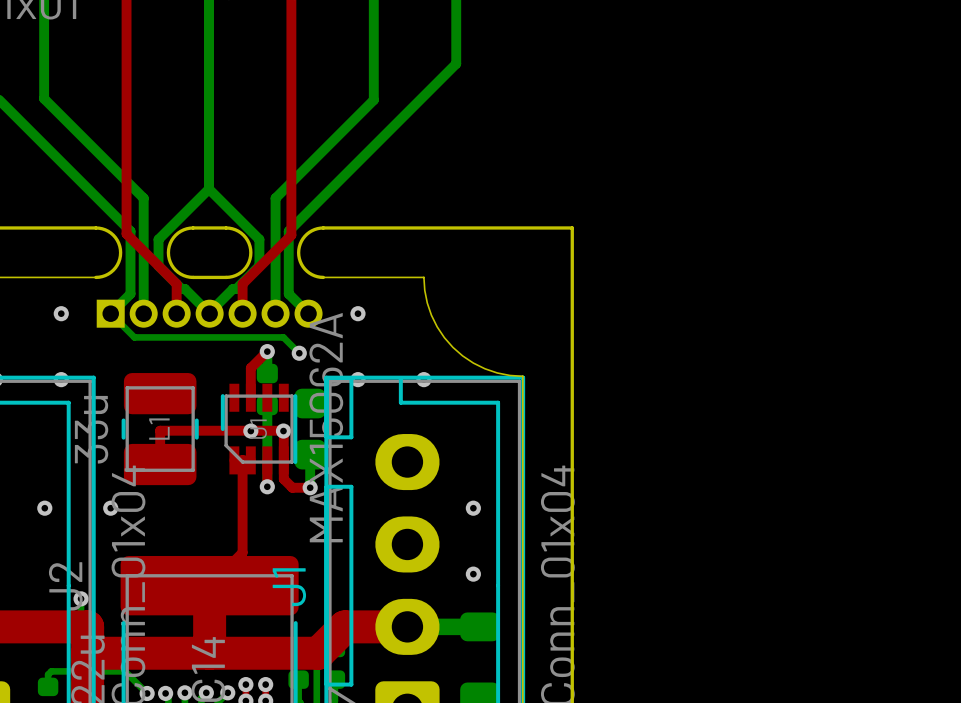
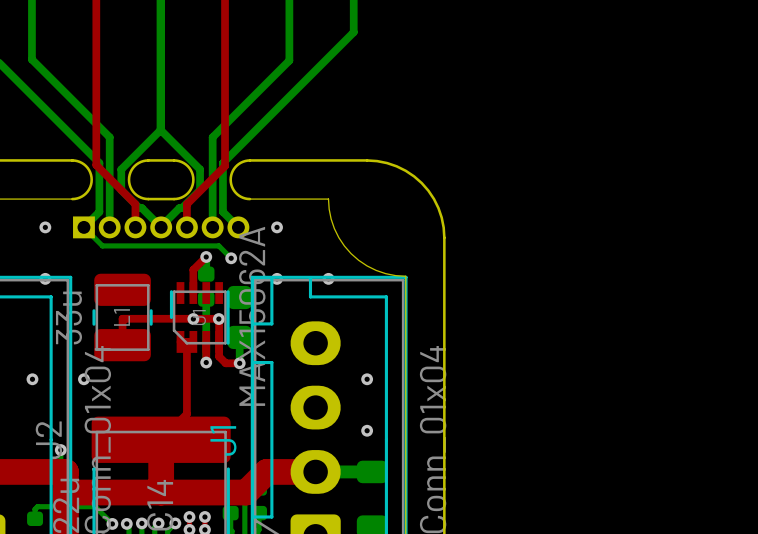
board edge: (473, 227) (572, 227) (572, 326) -> (367, 160) (396, 166) (421, 183) (438, 208) (444, 237)

